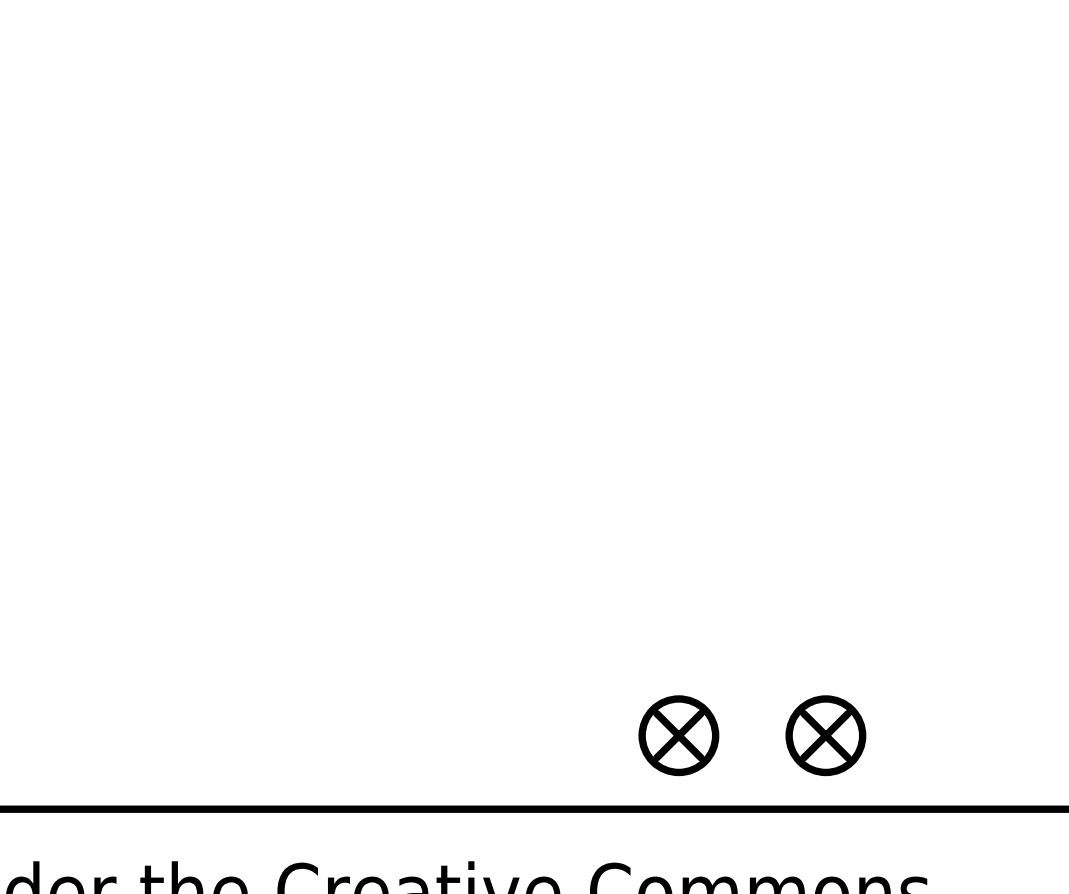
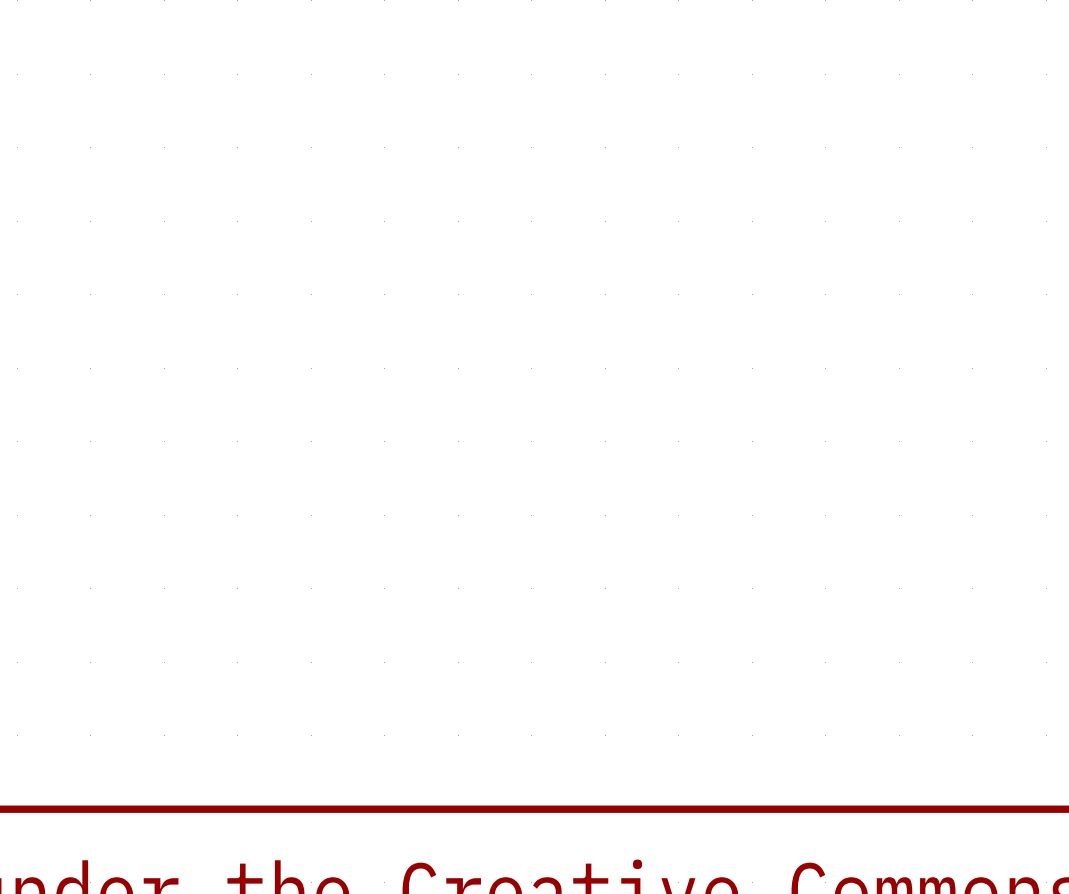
part: (678, 735) -> none
part: (825, 735) -> none

